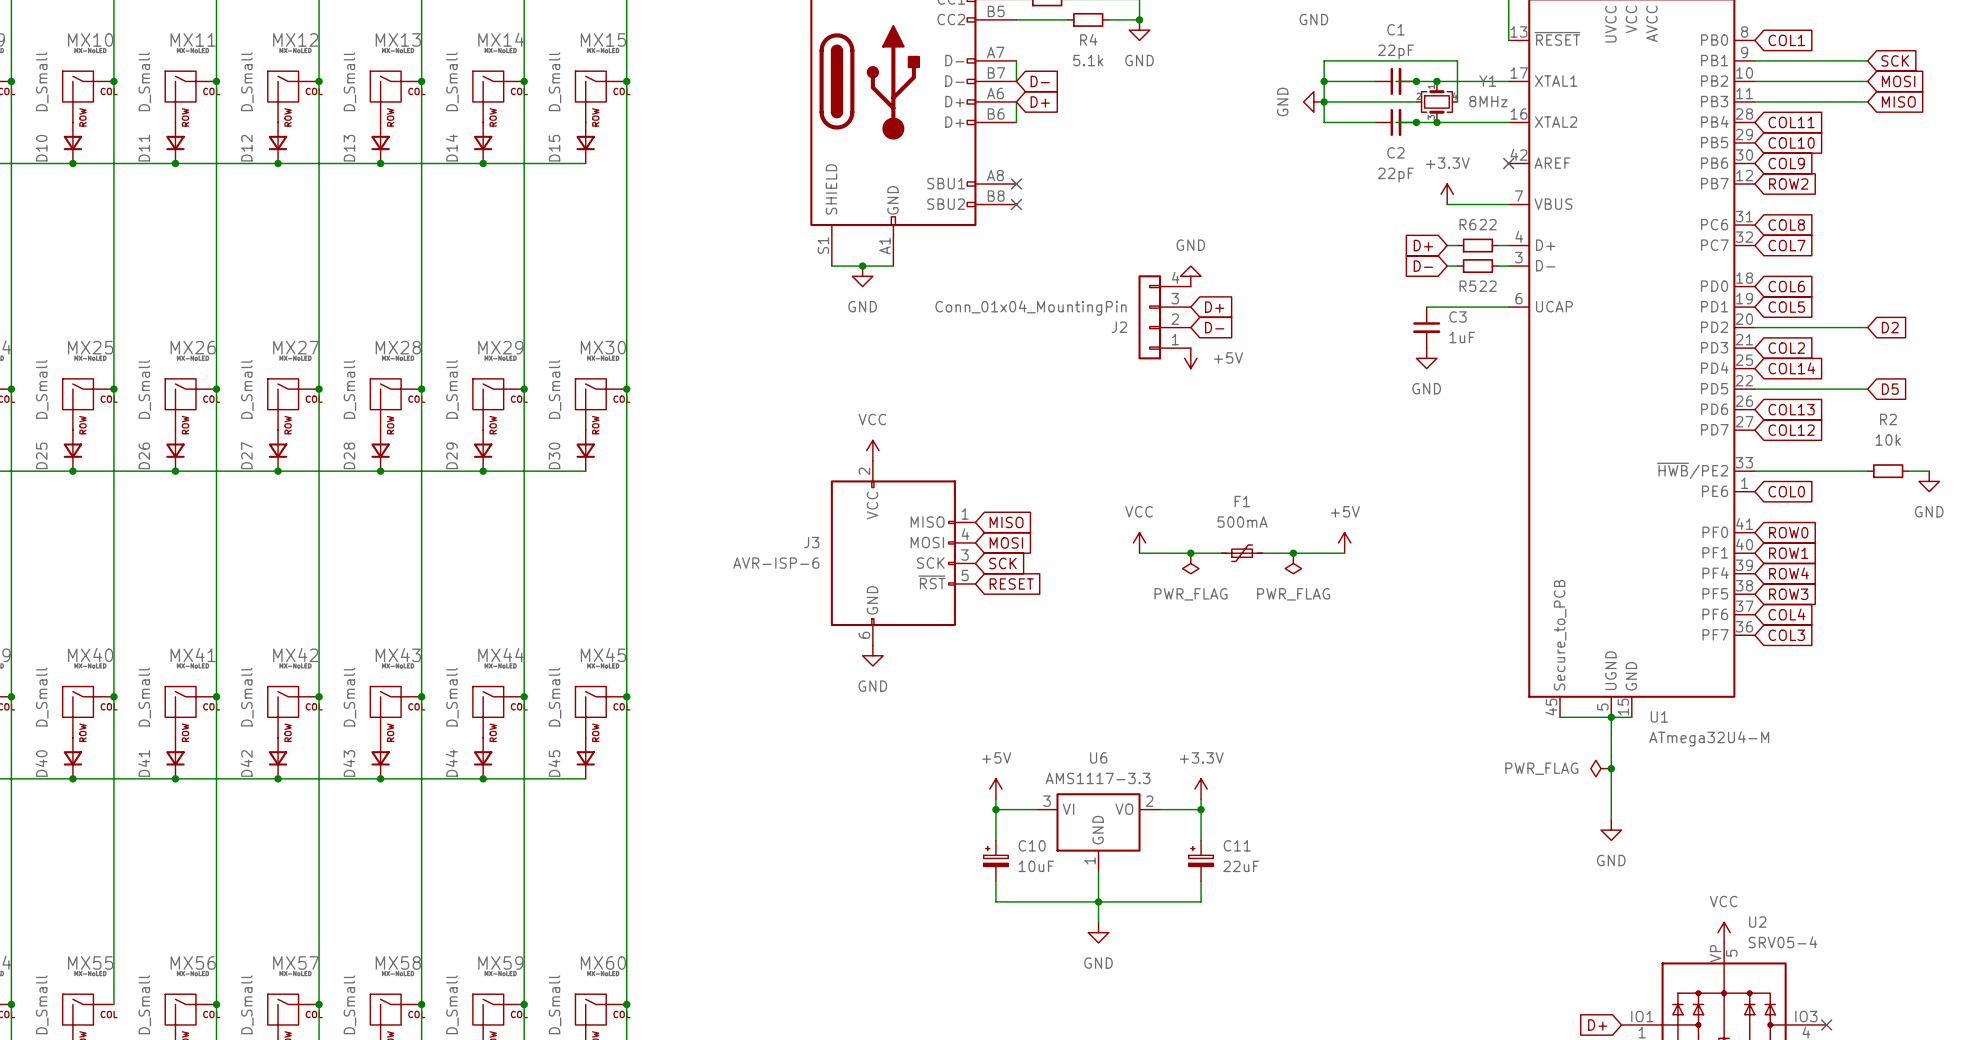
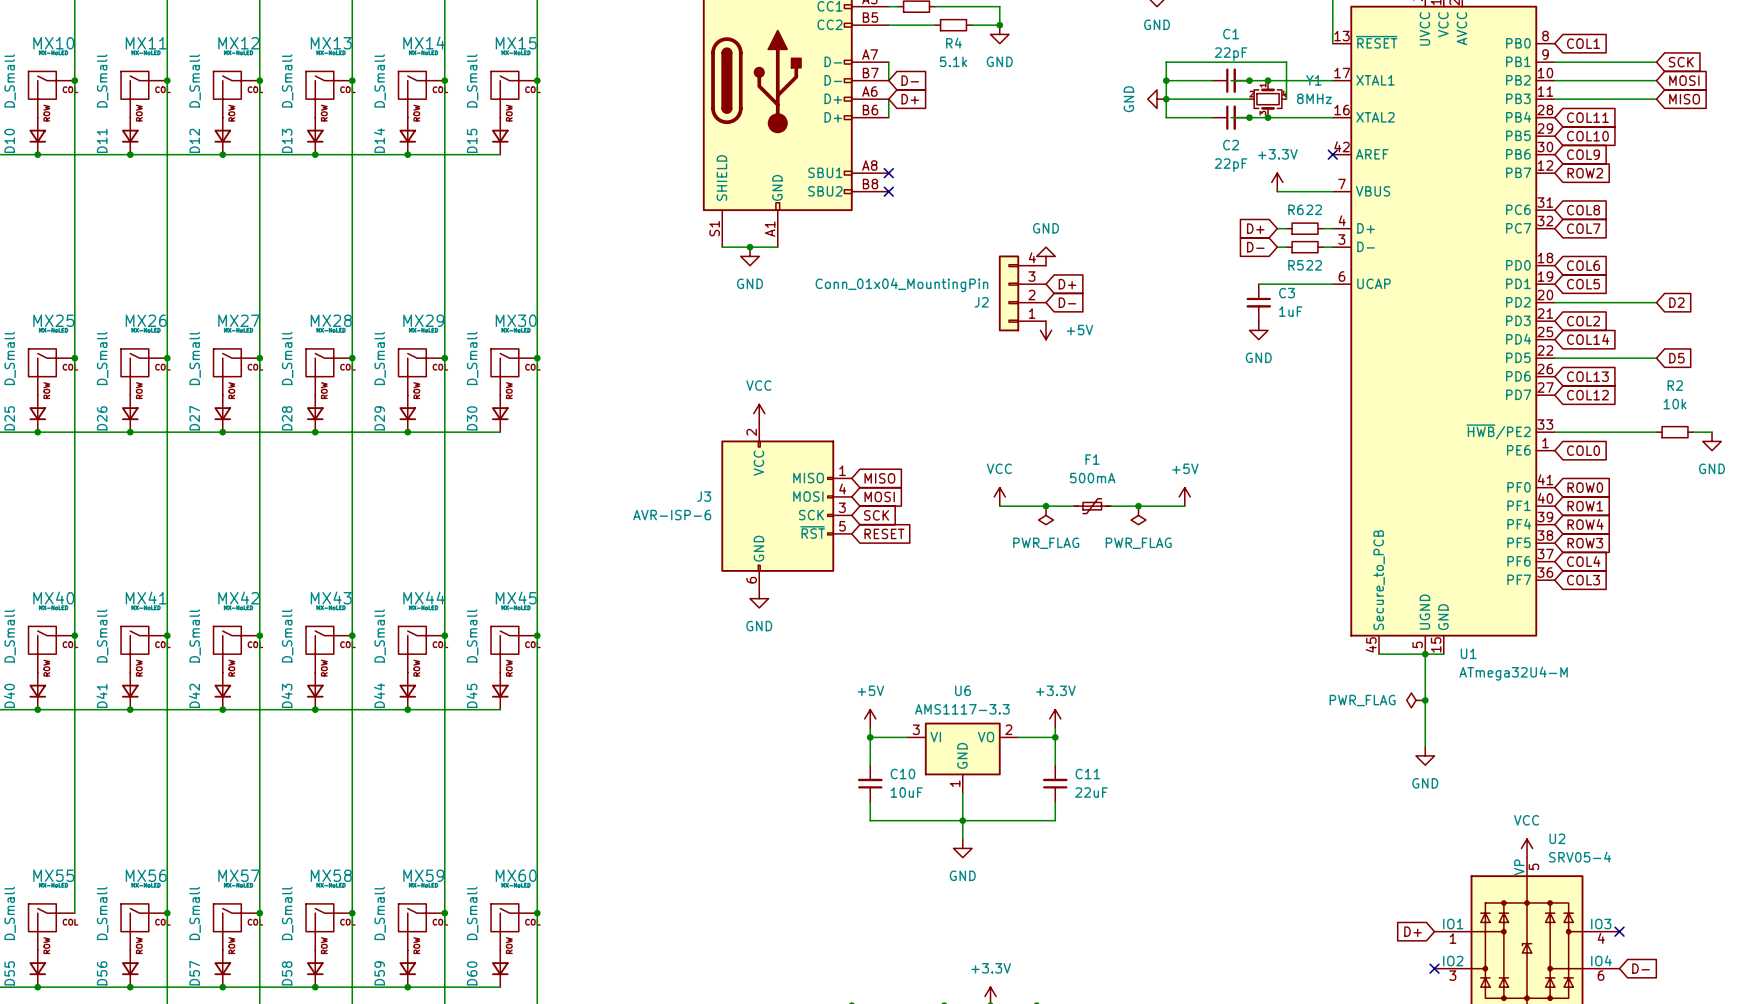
C10 symbol: [983, 840, 1009, 882] -> [857, 765, 883, 803]
C11 symbol: [1188, 840, 1214, 882] -> [1042, 765, 1068, 803]

